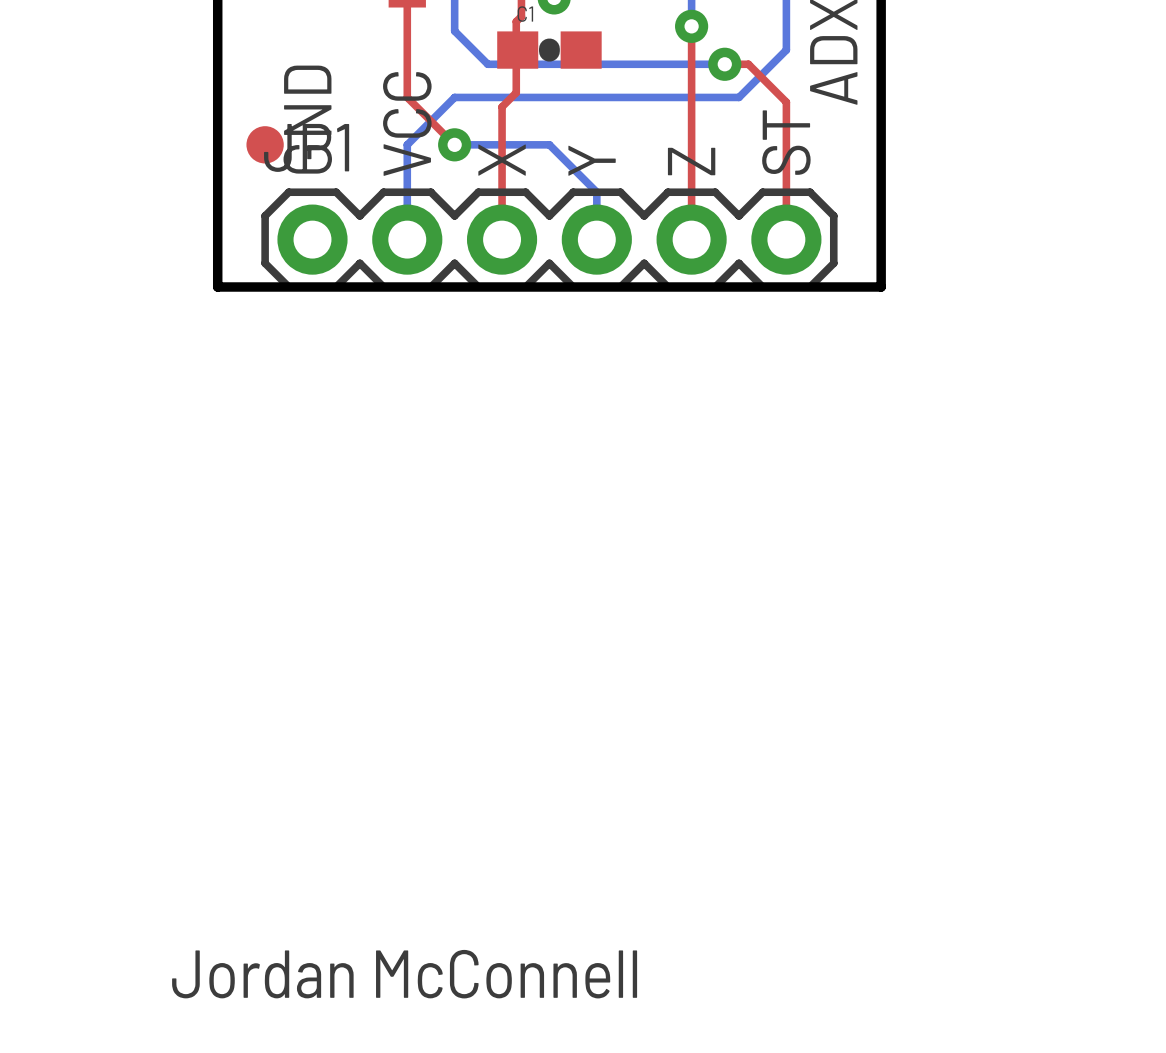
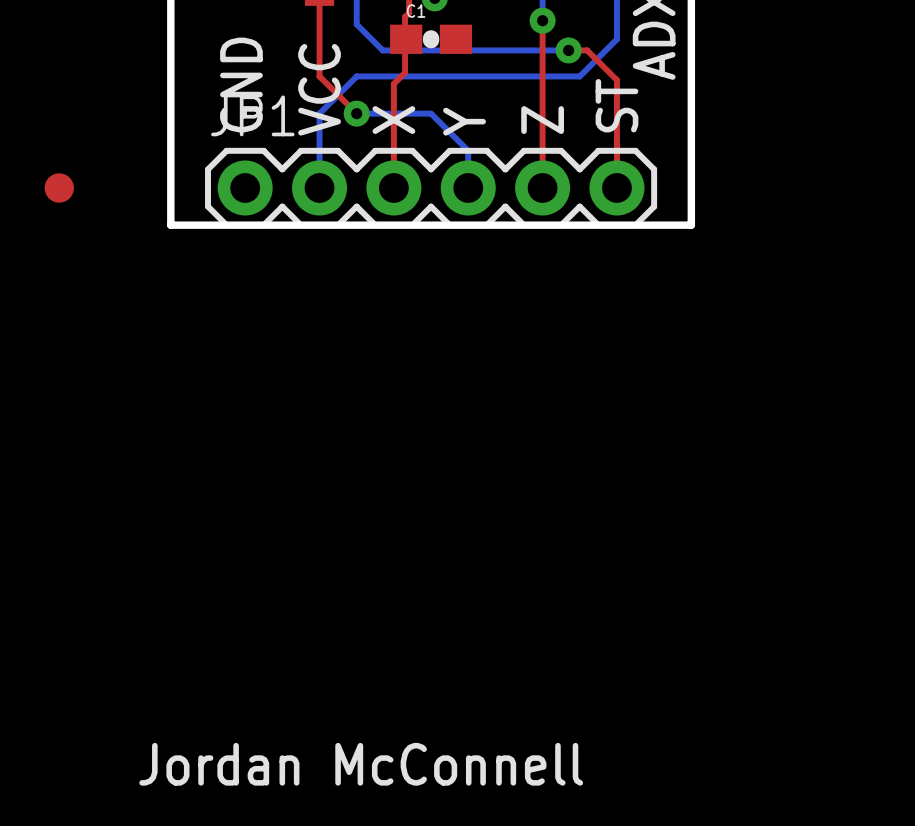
part position: (265, 144) -> (59, 187)

